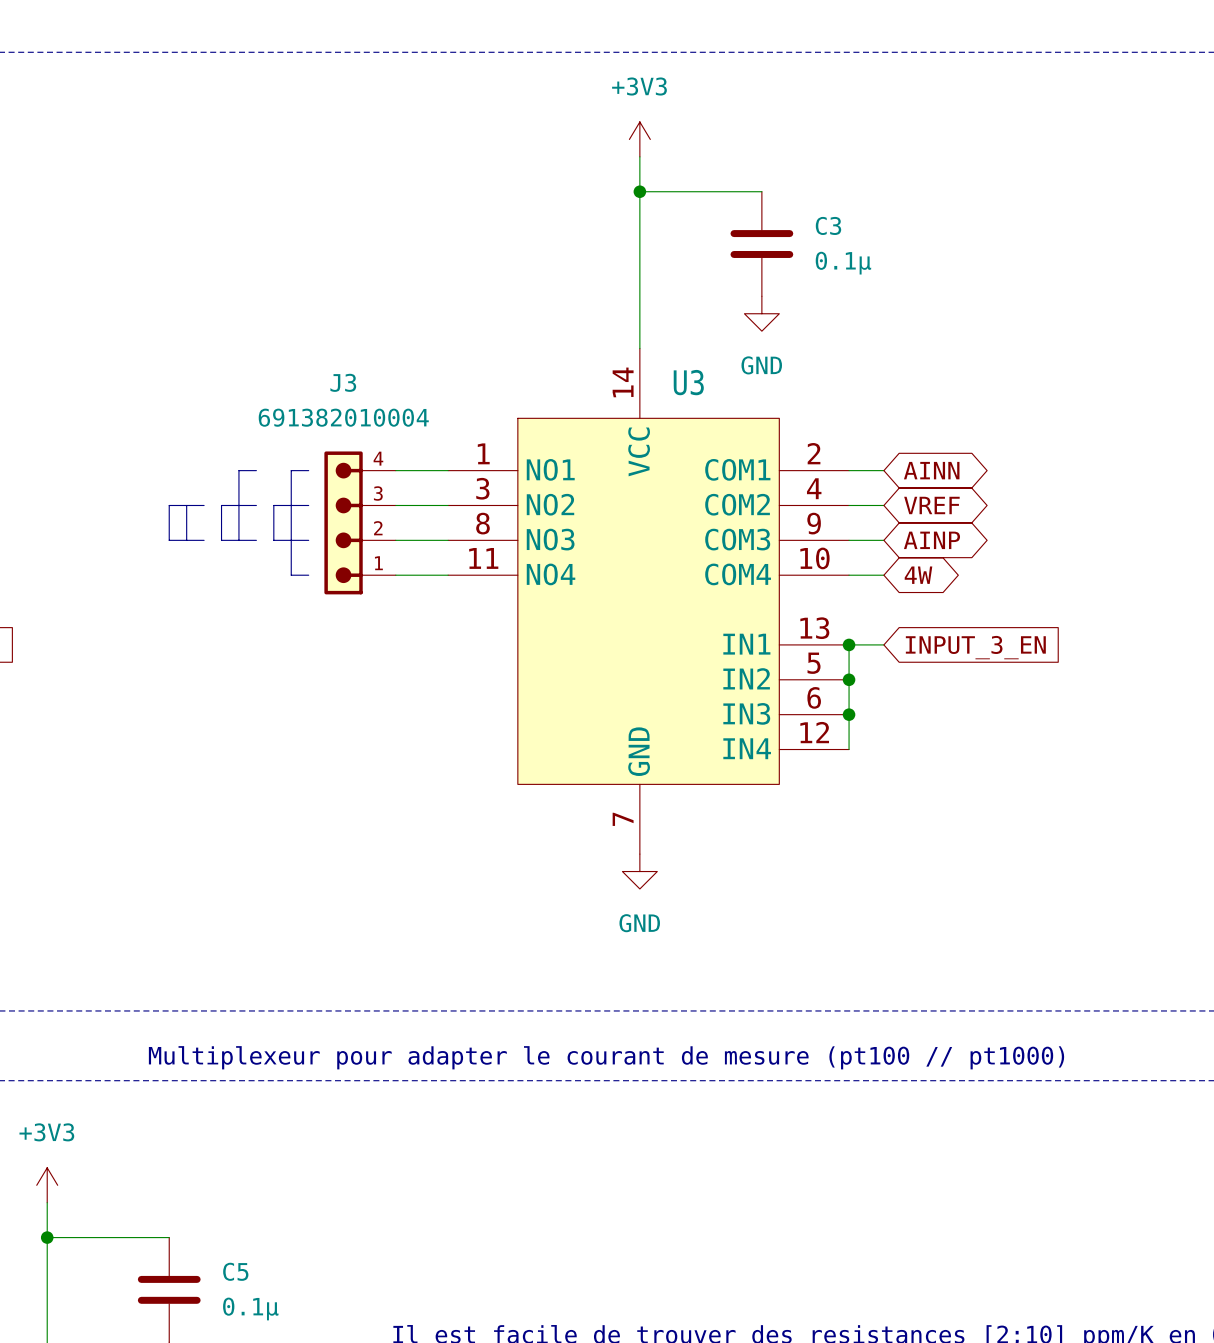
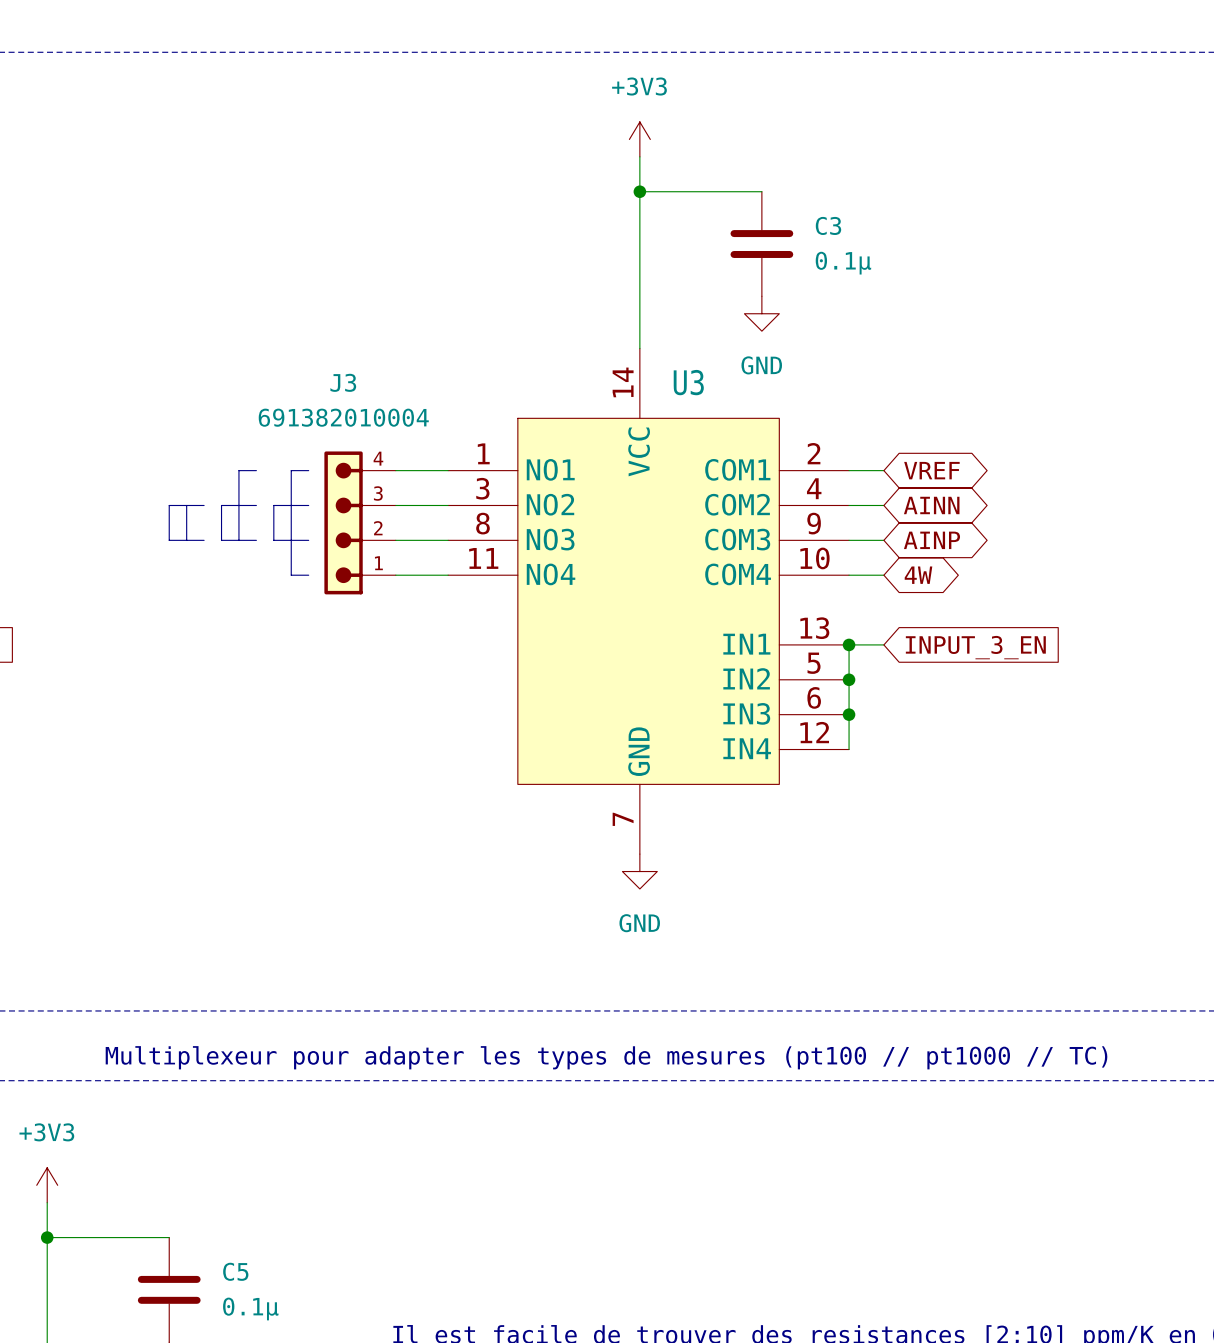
global label: AINN (931, 470) -> VREF (931, 470)
global label: VREF (931, 505) -> AINN (931, 505)
text: Multiplexeur pour adapter le courant de mesure (pt100 // pt1000) (606, 1057) -> Multiplexeur pour adapter les types de mesures (pt100 // pt1000 // TC) (606, 1057)

